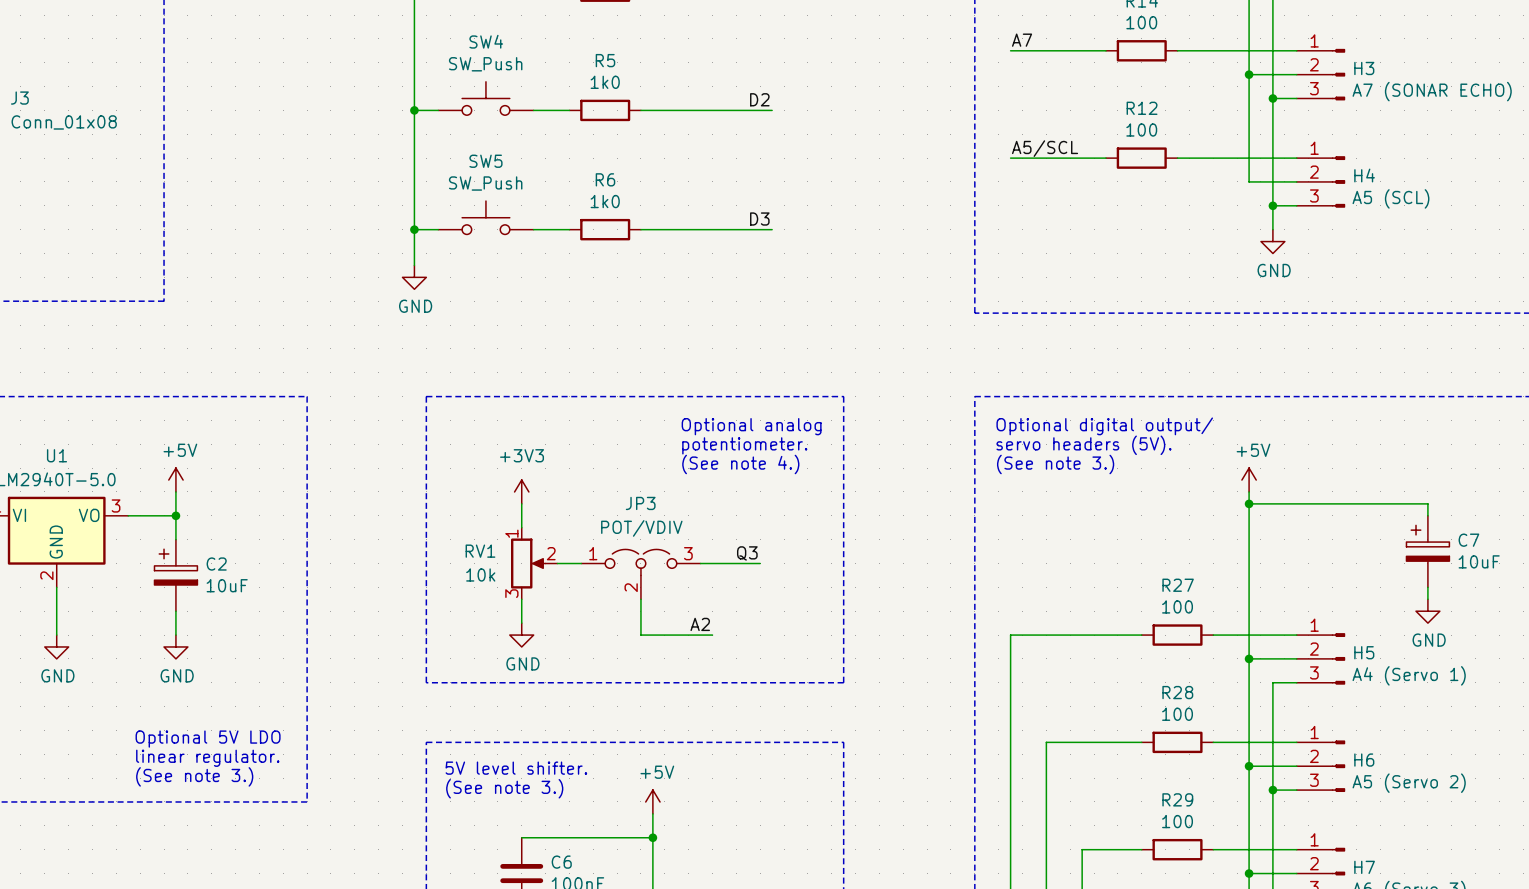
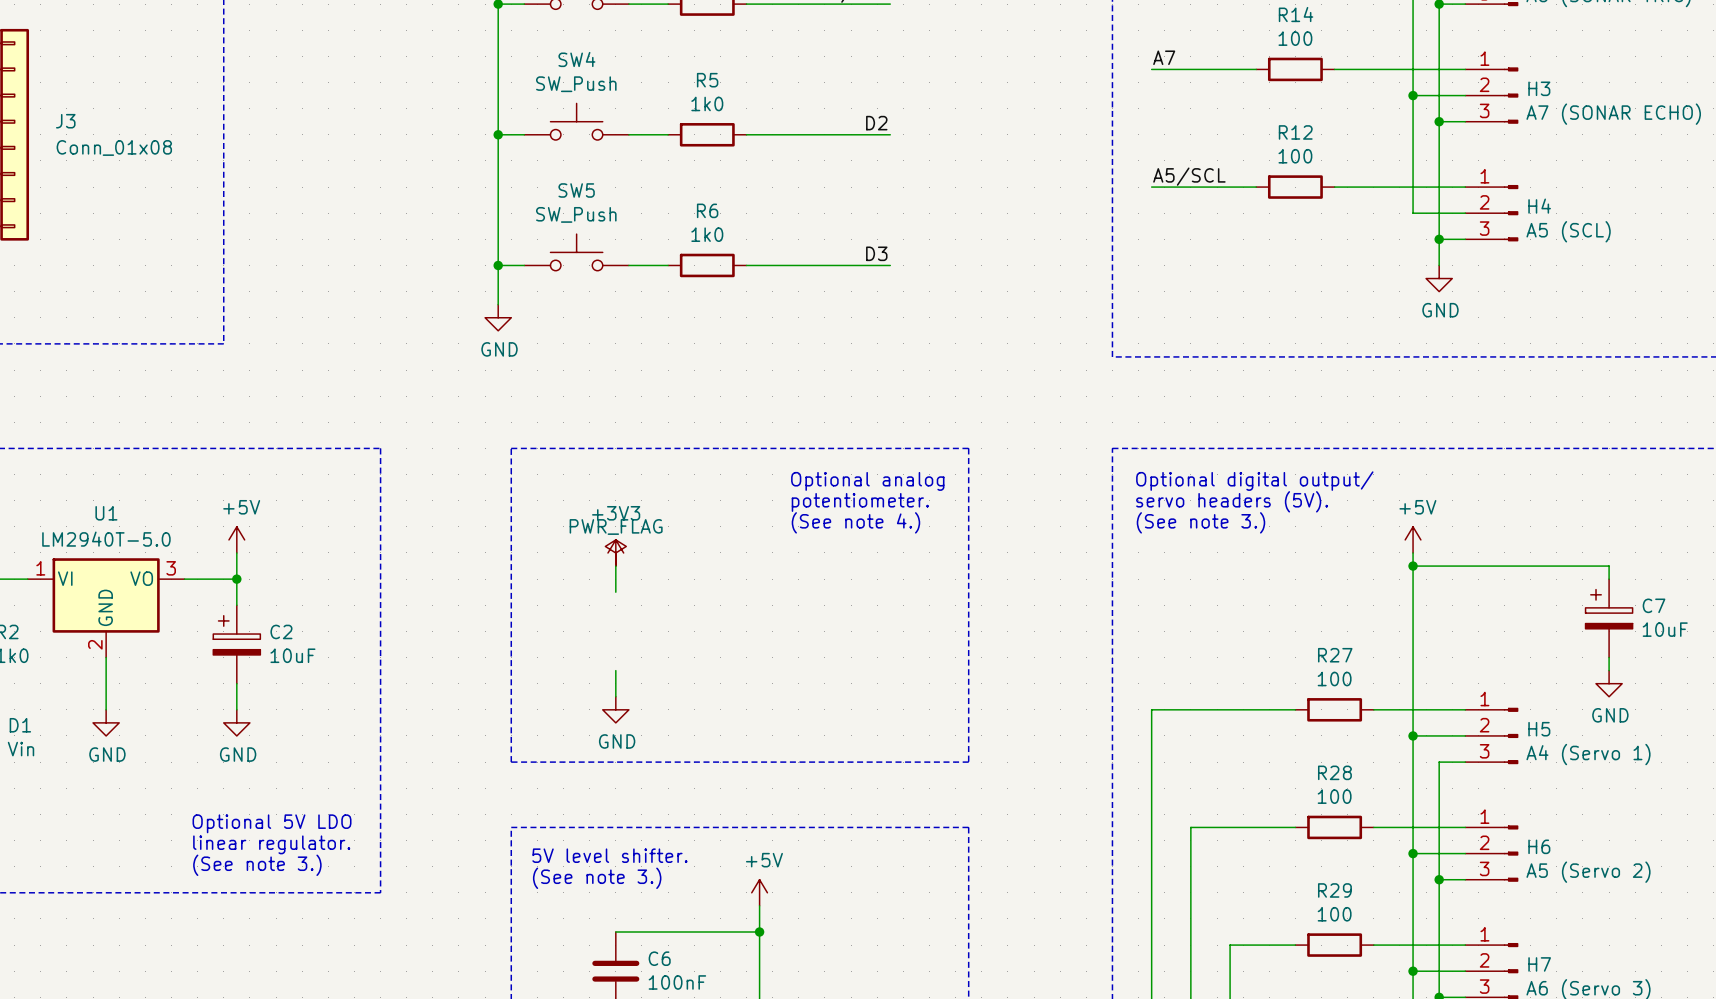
power symbol: none -> PWR_FLAG (615, 552)
label: Q3 (747, 553) -> none
RV1: 10k (534, 563) -> none
wire: (557, 563) (581, 563) -> none
wire: (700, 563) (760, 563) -> none
JP3: POT/VDIV (640, 574) -> none
wire: (640, 599) (640, 635) (712, 635) -> none
label: A2 (700, 624) -> none

